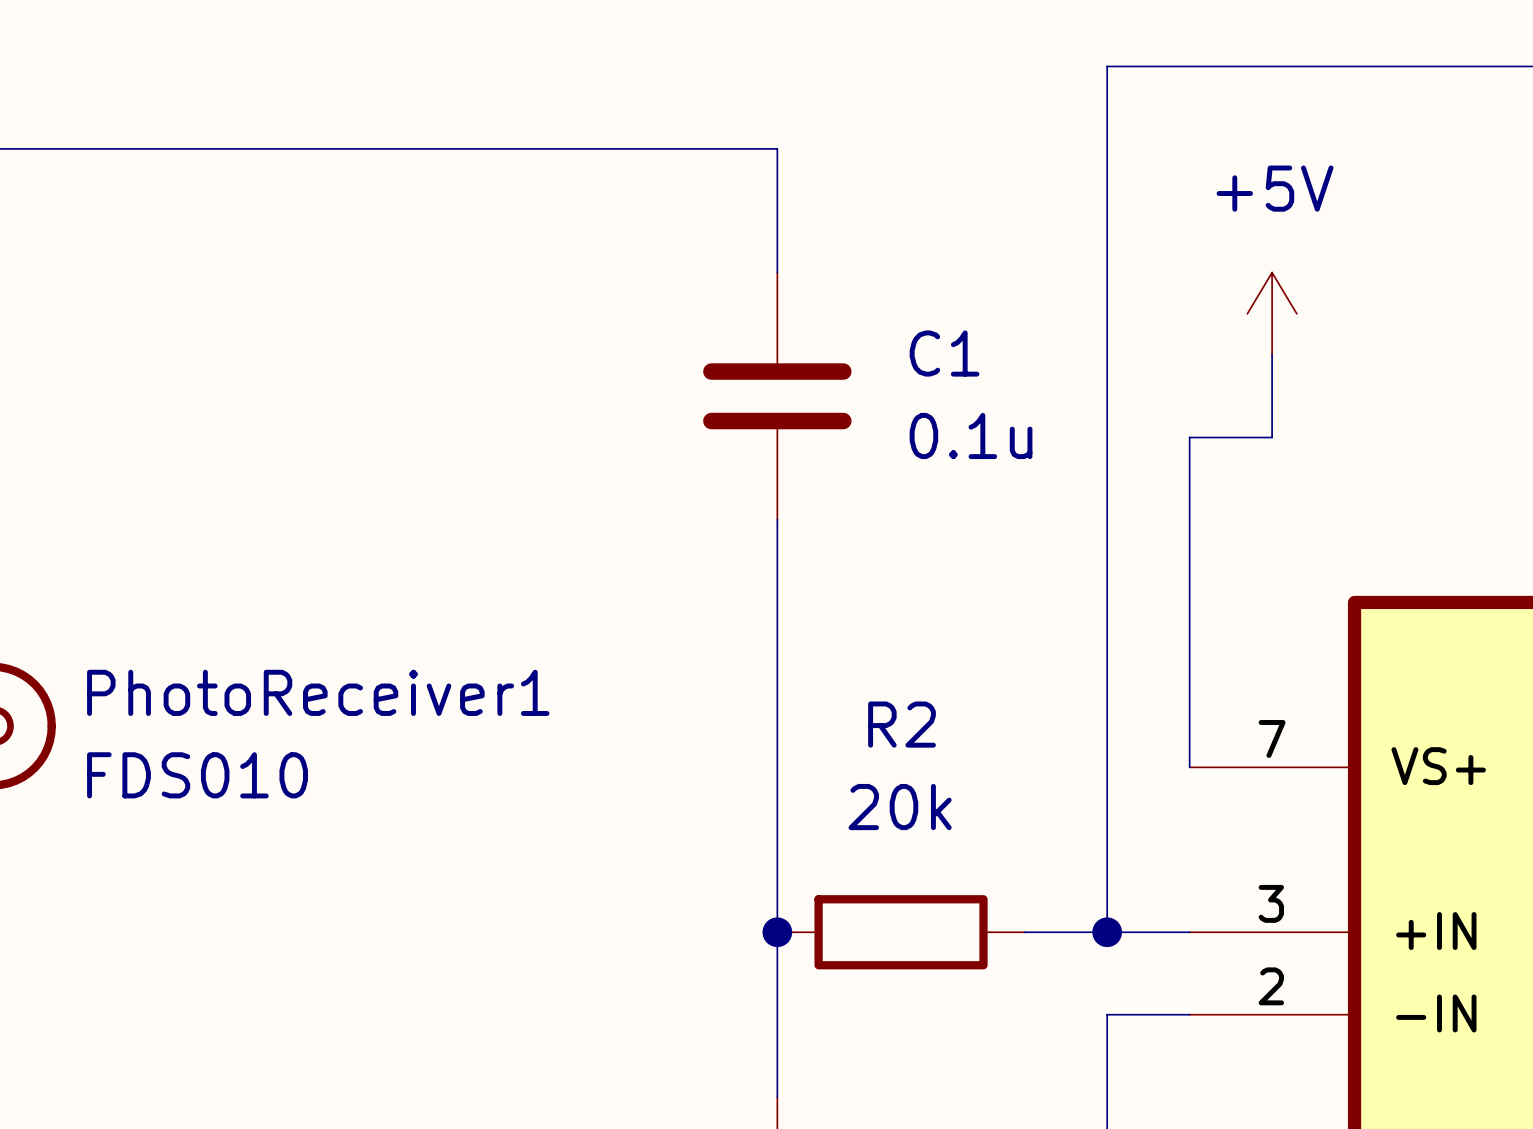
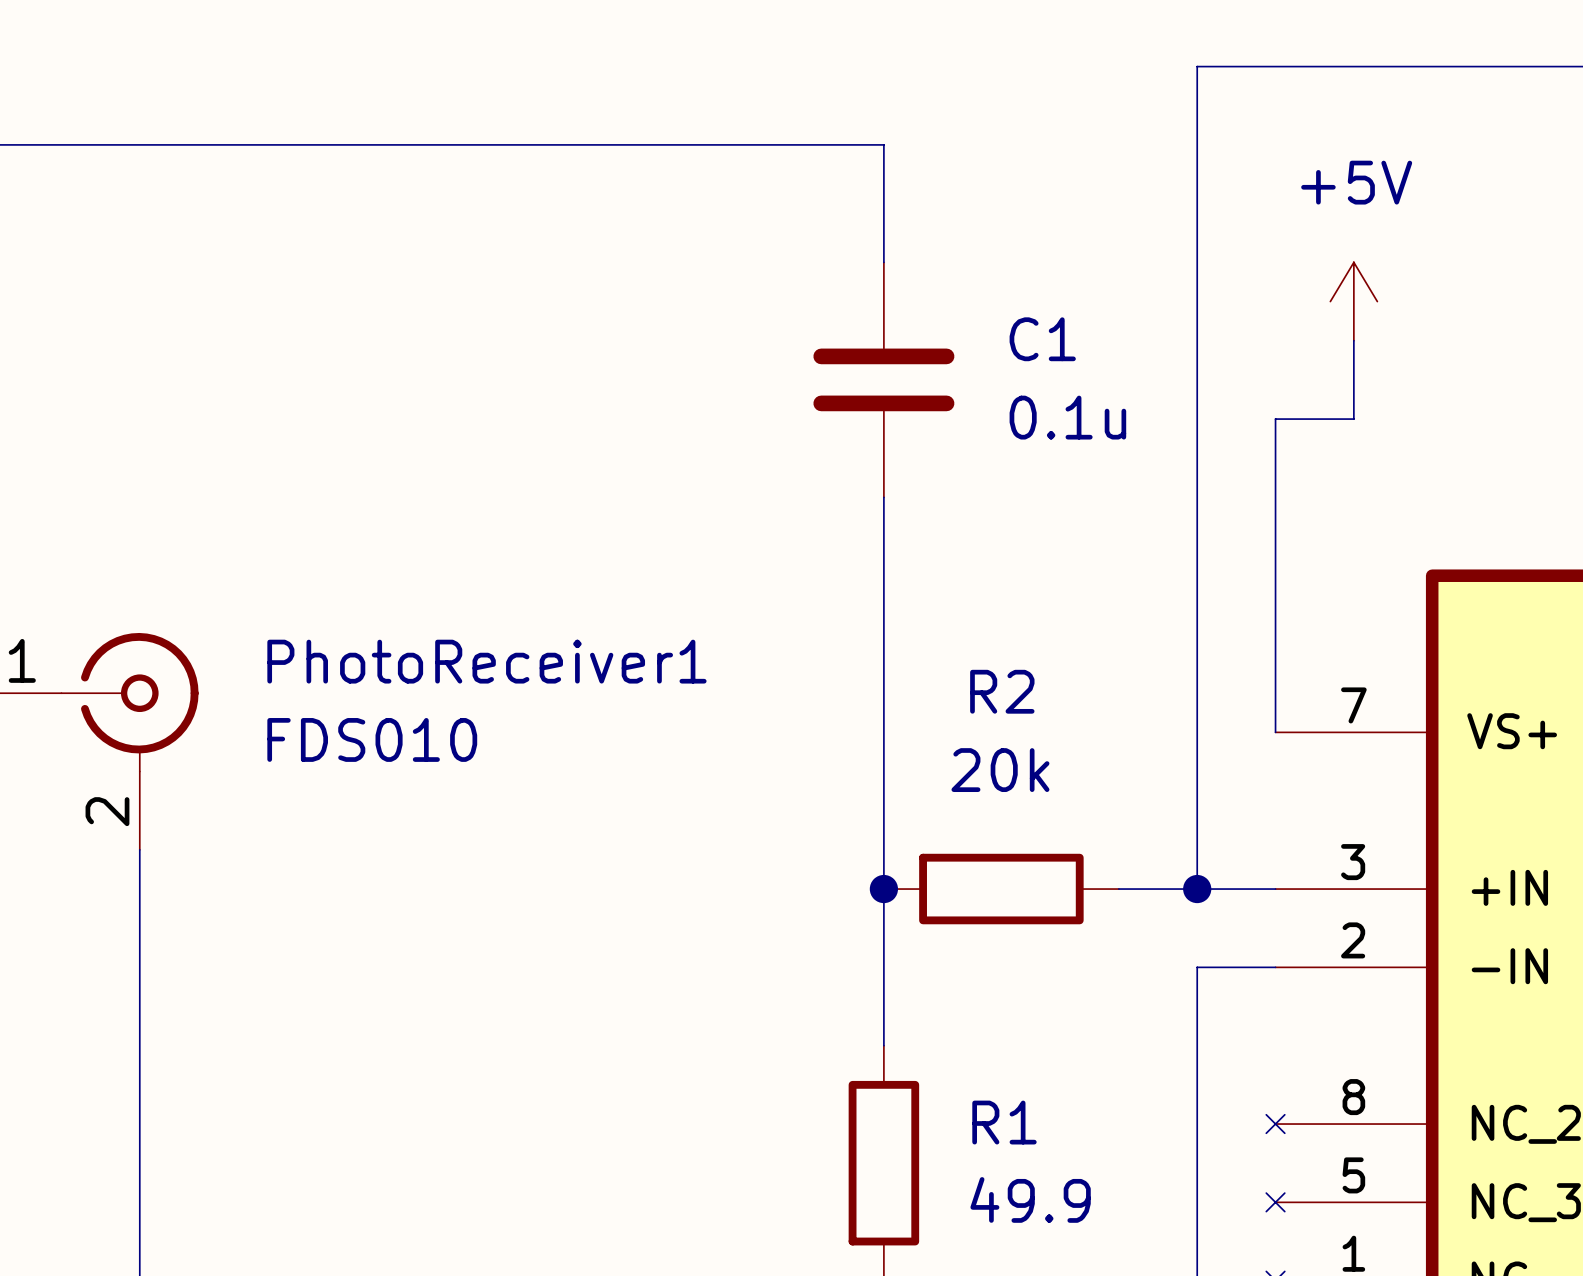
PhotoReceiver1 name position: PhotoReceiver1 (318, 692) -> PhotoReceiver1 (486, 661)
PhotoReceiver1 value position: FDS010 (197, 775) -> FDS010 (372, 739)

